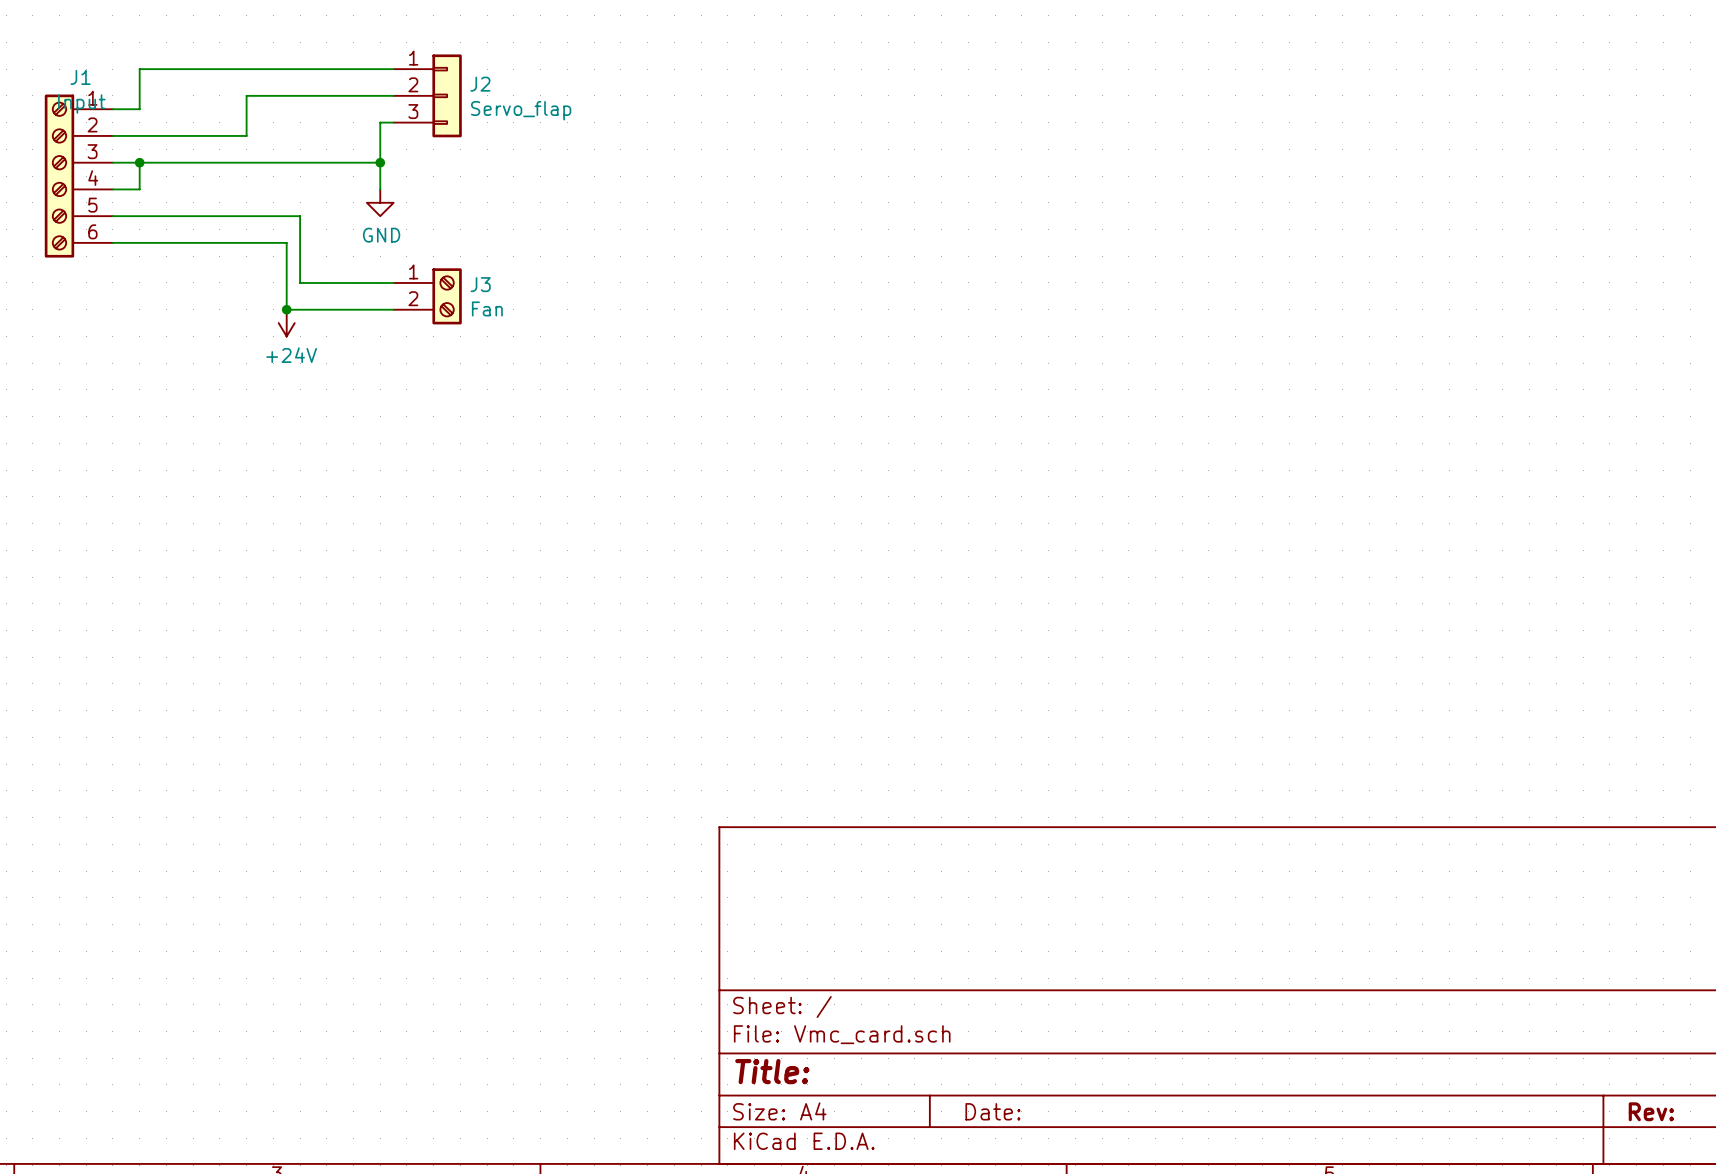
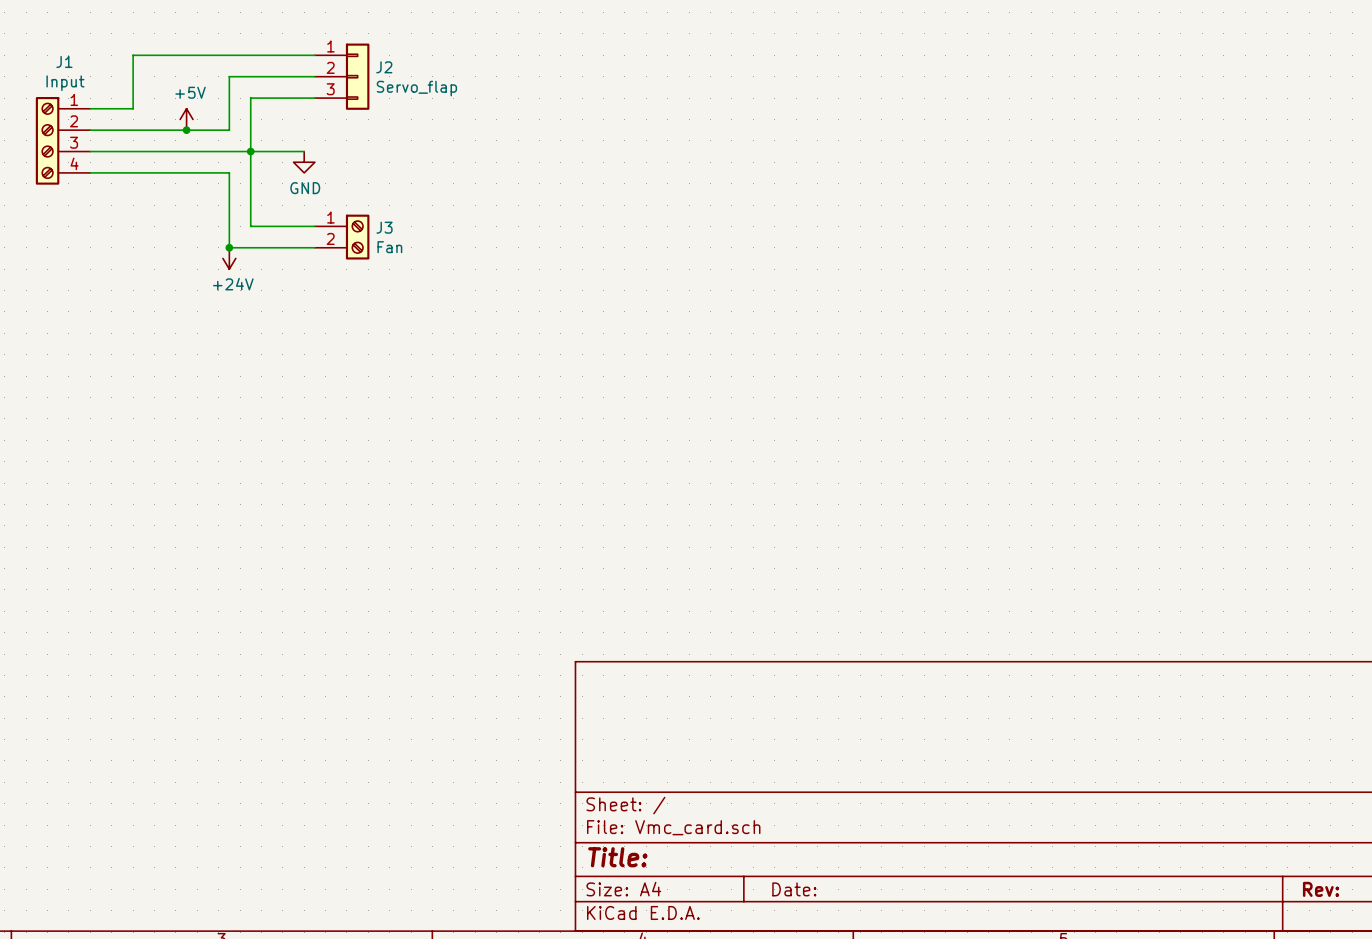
wire: (166, 69) (139, 69) (139, 109) (112, 109) -> (133, 55) (133, 108)
J1 symbol: [44, 94, 113, 258] -> [35, 97, 91, 185]
wire: (286, 95) (246, 95) (246, 135) (166, 135) -> none
wire: (380, 122) (380, 189) -> (304, 98) (250, 98) (250, 226)
power symbol: none -> +5V (186, 119)
wire: (139, 162) (139, 189) -> (304, 151) (111, 151)
junction: (139, 162) -> none
junction: none -> (186, 130)
wire: (286, 162) (380, 162) -> (229, 130) (229, 76)
junction: (380, 162) -> none
junction: none -> (250, 151)
wire: (286, 216) (300, 216) (300, 282) (313, 282) -> (229, 172) (229, 194)
wire: (112, 242) (286, 242) -> none

